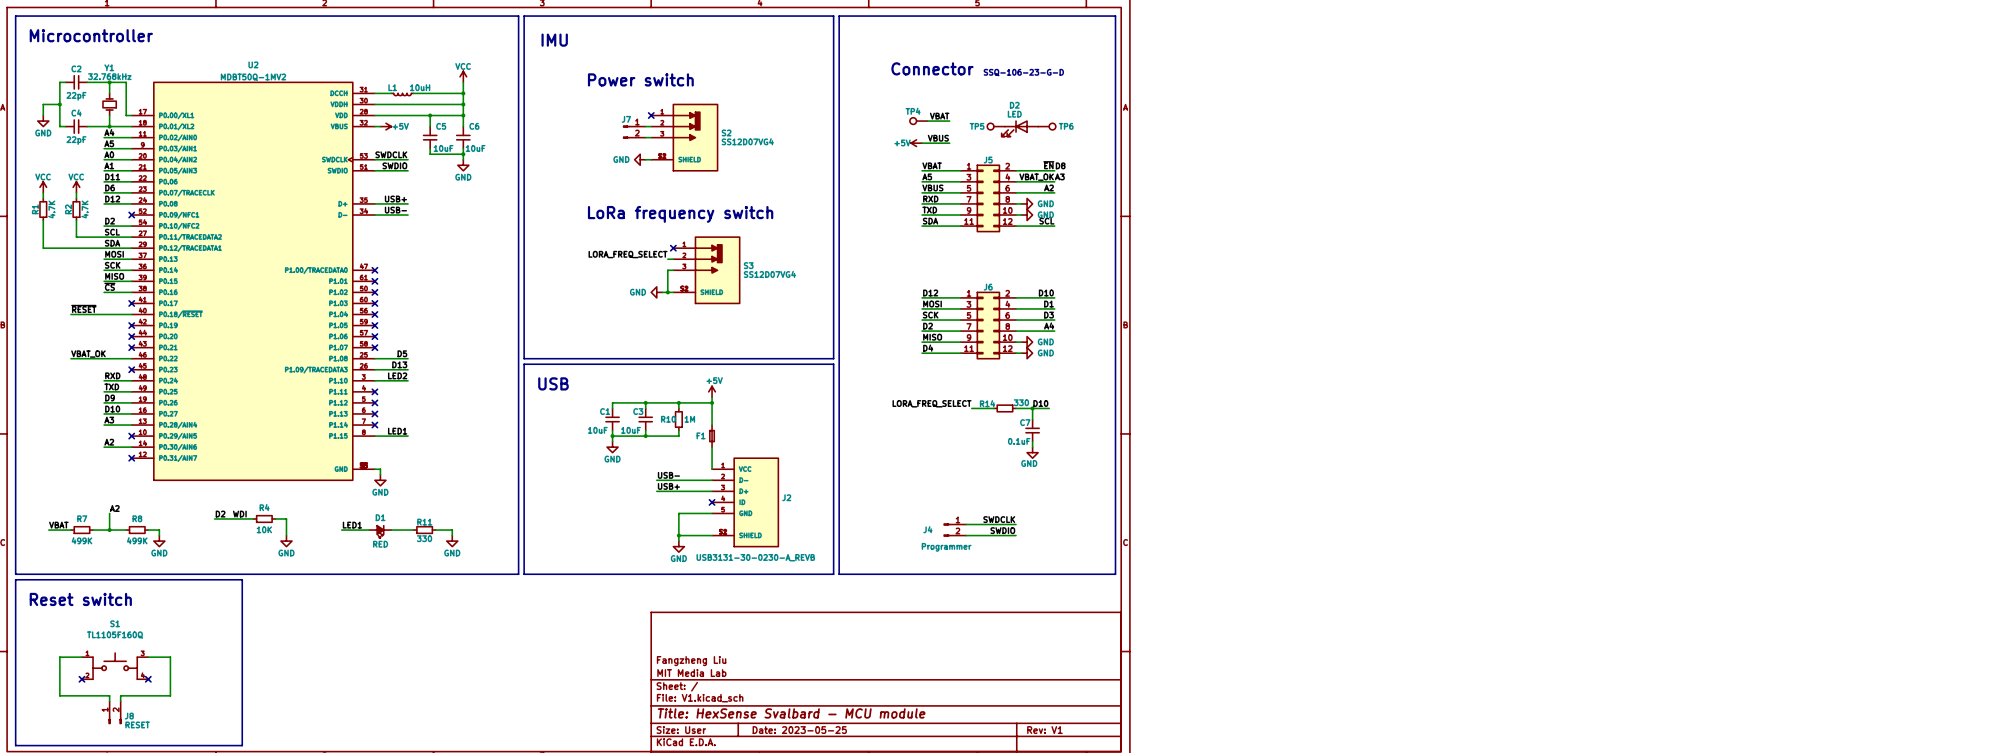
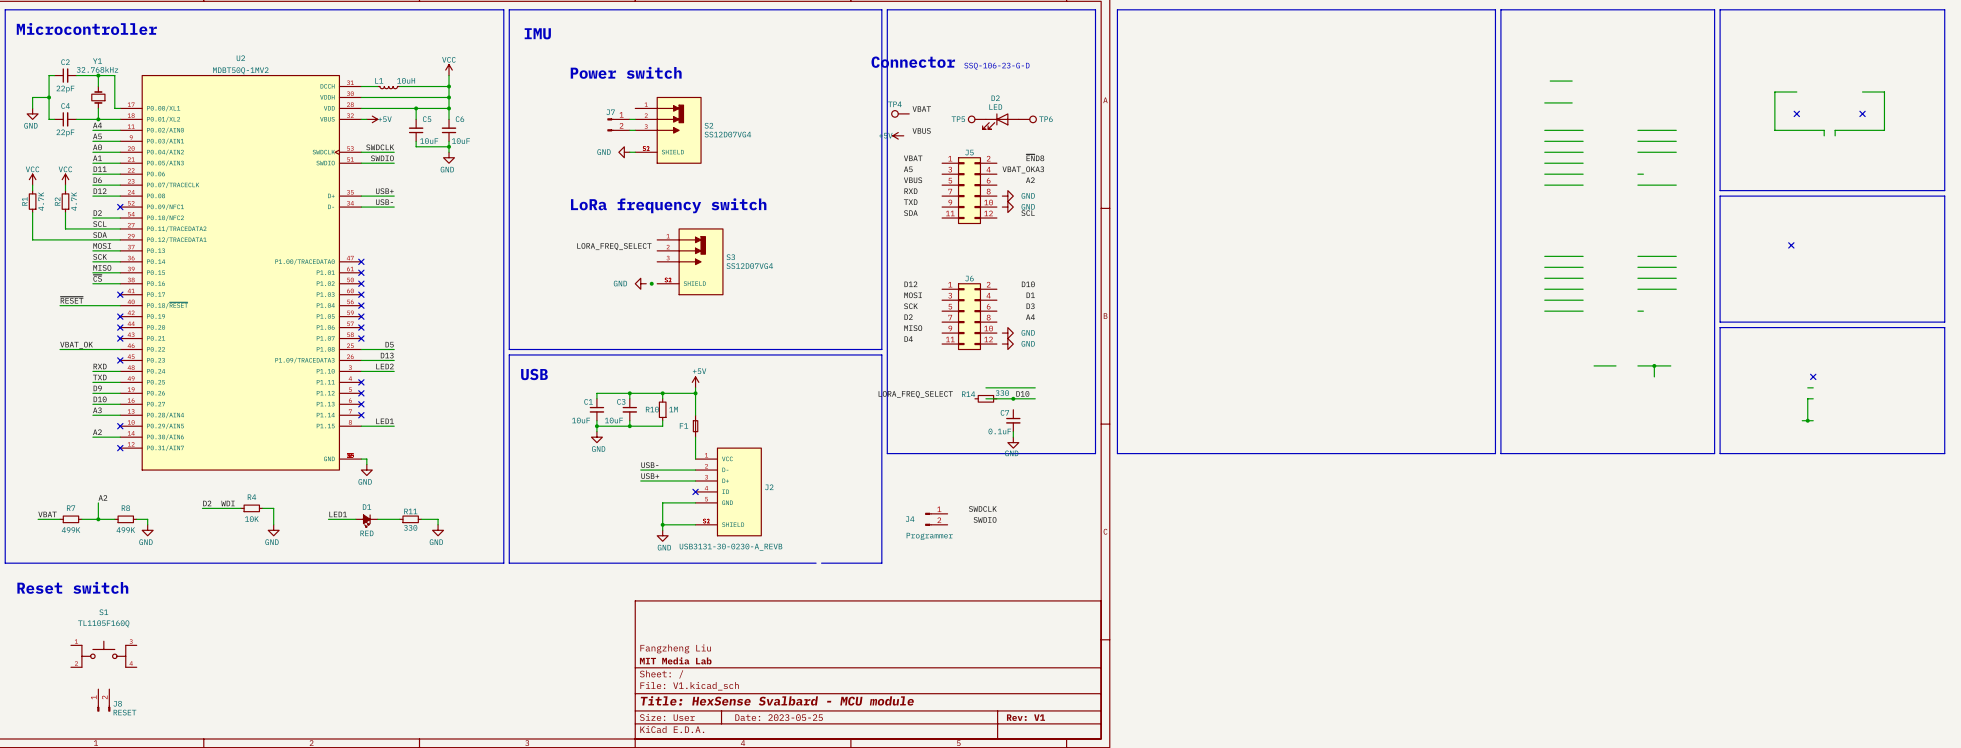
line: (833, 16) (833, 358) -> (881, 9) (881, 349) (816, 349)
line: (839, 16) (839, 574) -> (821, 9) (816, 9)
line: (899, 16) (905, 16) -> (1095, 453) (887, 453) (887, 9)
line: none -> (1117, 9) (1495, 9) (1495, 453) (1117, 453) (1117, 9)
line: none -> (1500, 9) (1714, 9) (1714, 453) (1500, 453) (1500, 9)
line: none -> (1720, 9) (1720, 190) (1944, 190) (1944, 9) (1720, 9)
wire: none -> (1550, 81) (1572, 81)
wire: none -> (1796, 91) (1774, 91) (1774, 130) (1824, 130) (1824, 135)
wire: none -> (1862, 91) (1884, 91) (1884, 130) (1835, 130) (1835, 135)
wire: none -> (1544, 102) (1572, 102)
no-connect mark: (651, 115) -> none
wire: (927, 121) (949, 121) -> none
no-connect mark: none -> (1796, 113)
no-connect mark: none -> (1862, 113)
wire: none -> (1544, 130) (1583, 130)
wire: none -> (1637, 130) (1676, 130)
wire: (922, 143) (949, 143) -> none
wire: none -> (1544, 141) (1583, 141)
wire: none -> (1637, 141) (1676, 141)
wire: none -> (1544, 152) (1583, 152)
wire: none -> (1637, 152) (1676, 152)
wire: (922, 170) (960, 170) -> none
wire: (1016, 170) (1054, 170) -> none
wire: none -> (1544, 163) (1583, 163)
wire: (922, 181) (960, 181) -> none
wire: (1016, 181) (1054, 181) -> none
wire: none -> (1544, 174) (1583, 174)
wire: none -> (1637, 174) (1643, 174)
wire: (922, 192) (960, 192) -> none
wire: (1016, 192) (1054, 192) -> none
wire: none -> (1544, 185) (1583, 185)
wire: none -> (1637, 185) (1676, 185)
wire: (922, 203) (960, 203) -> none
wire: (1016, 203) (1021, 203) -> none
line: none -> (1720, 196) (1720, 322) (1944, 322) (1944, 196) (1720, 196)
wire: (922, 215) (960, 215) -> none
wire: (1016, 215) (1021, 215) -> none
wire: (922, 226) (960, 226) -> none
wire: (1016, 226) (1054, 226) -> none
no-connect mark: (673, 248) -> none
no-connect mark: none -> (1791, 245)
wire: (667, 259) (673, 259) -> none
wire: none -> (1544, 256) (1583, 256)
wire: none -> (1637, 256) (1676, 256)
wire: (673, 270) (667, 270) (667, 292) -> none
wire: none -> (1544, 267) (1583, 267)
wire: none -> (1637, 267) (1676, 267)
wire: none -> (1544, 278) (1583, 278)
wire: none -> (1637, 278) (1676, 278)
wire: (662, 292) (673, 292) -> none
wire: (922, 297) (960, 297) -> none
wire: (1016, 297) (1054, 297) -> none
wire: none -> (1544, 289) (1583, 289)
wire: none -> (1637, 289) (1676, 289)
wire: (922, 308) (960, 308) -> none
wire: (1016, 308) (1054, 308) -> none
wire: none -> (1544, 300) (1583, 300)
wire: (922, 320) (960, 320) -> none
wire: (1016, 320) (1054, 320) -> none
wire: none -> (1544, 311) (1583, 311)
wire: none -> (1637, 311) (1643, 311)
wire: (922, 331) (960, 331) -> none
wire: (1016, 331) (1054, 331) -> none
line: none -> (1720, 327) (1944, 327) (1944, 453) (1720, 453) (1720, 327)
wire: (922, 342) (960, 342) -> none
wire: (1016, 342) (1021, 342) -> none
wire: (922, 353) (960, 353) -> none
wire: (1016, 353) (1021, 353) -> (1029, 398) (1035, 398)
line: (833, 364) (833, 574) -> (816, 354) (881, 354) (881, 563)
wire: none -> (1594, 365) (1615, 365)
wire: none -> (1637, 365) (1670, 365)
wire: none -> (1654, 365) (1654, 376)
junction: none -> (1654, 365)
no-connect mark: none -> (1813, 376)
wire: none -> (985, 387) (1035, 387)
wire: none -> (1807, 387) (1813, 387)
wire: (971, 408) (993, 408) -> none
wire: none -> (985, 398) (996, 398)
wire: (1032, 408) (1032, 419) -> none
wire: none -> (1813, 398) (1807, 398) (1807, 420)
wire: none -> (1802, 420) (1813, 420)
junction: none -> (1807, 420)
line: (1115, 463) (1115, 574) (899, 574) -> none
wire: (966, 524) (1016, 524) -> none
wire: (966, 535) (1016, 535) -> none
line: (15, 579) (242, 579) (242, 745) (15, 745) (15, 579) -> none
wire: (81, 657) (59, 657) (59, 695) (109, 695) (109, 701) -> none
wire: (148, 657) (170, 657) (170, 695) (120, 695) (120, 701) -> none
no-connect mark: (81, 679) -> none
no-connect mark: (148, 679) -> none

